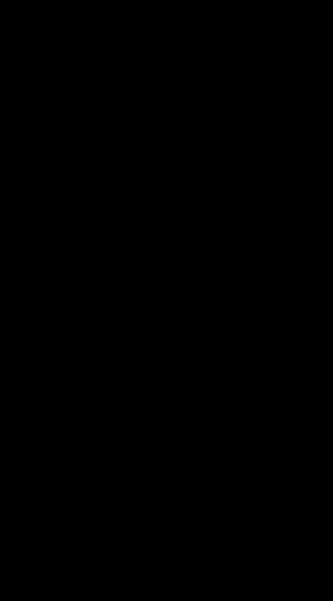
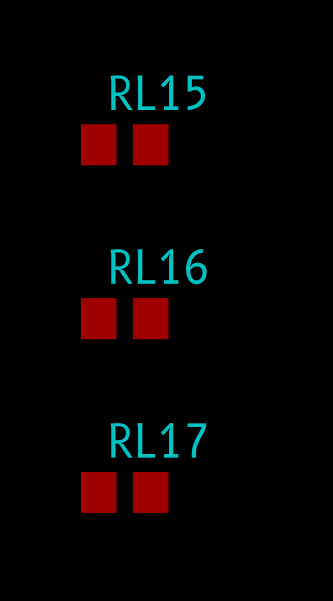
RL15: none -> (124, 144)
RL16: none -> (124, 318)
RL17: none -> (124, 492)

